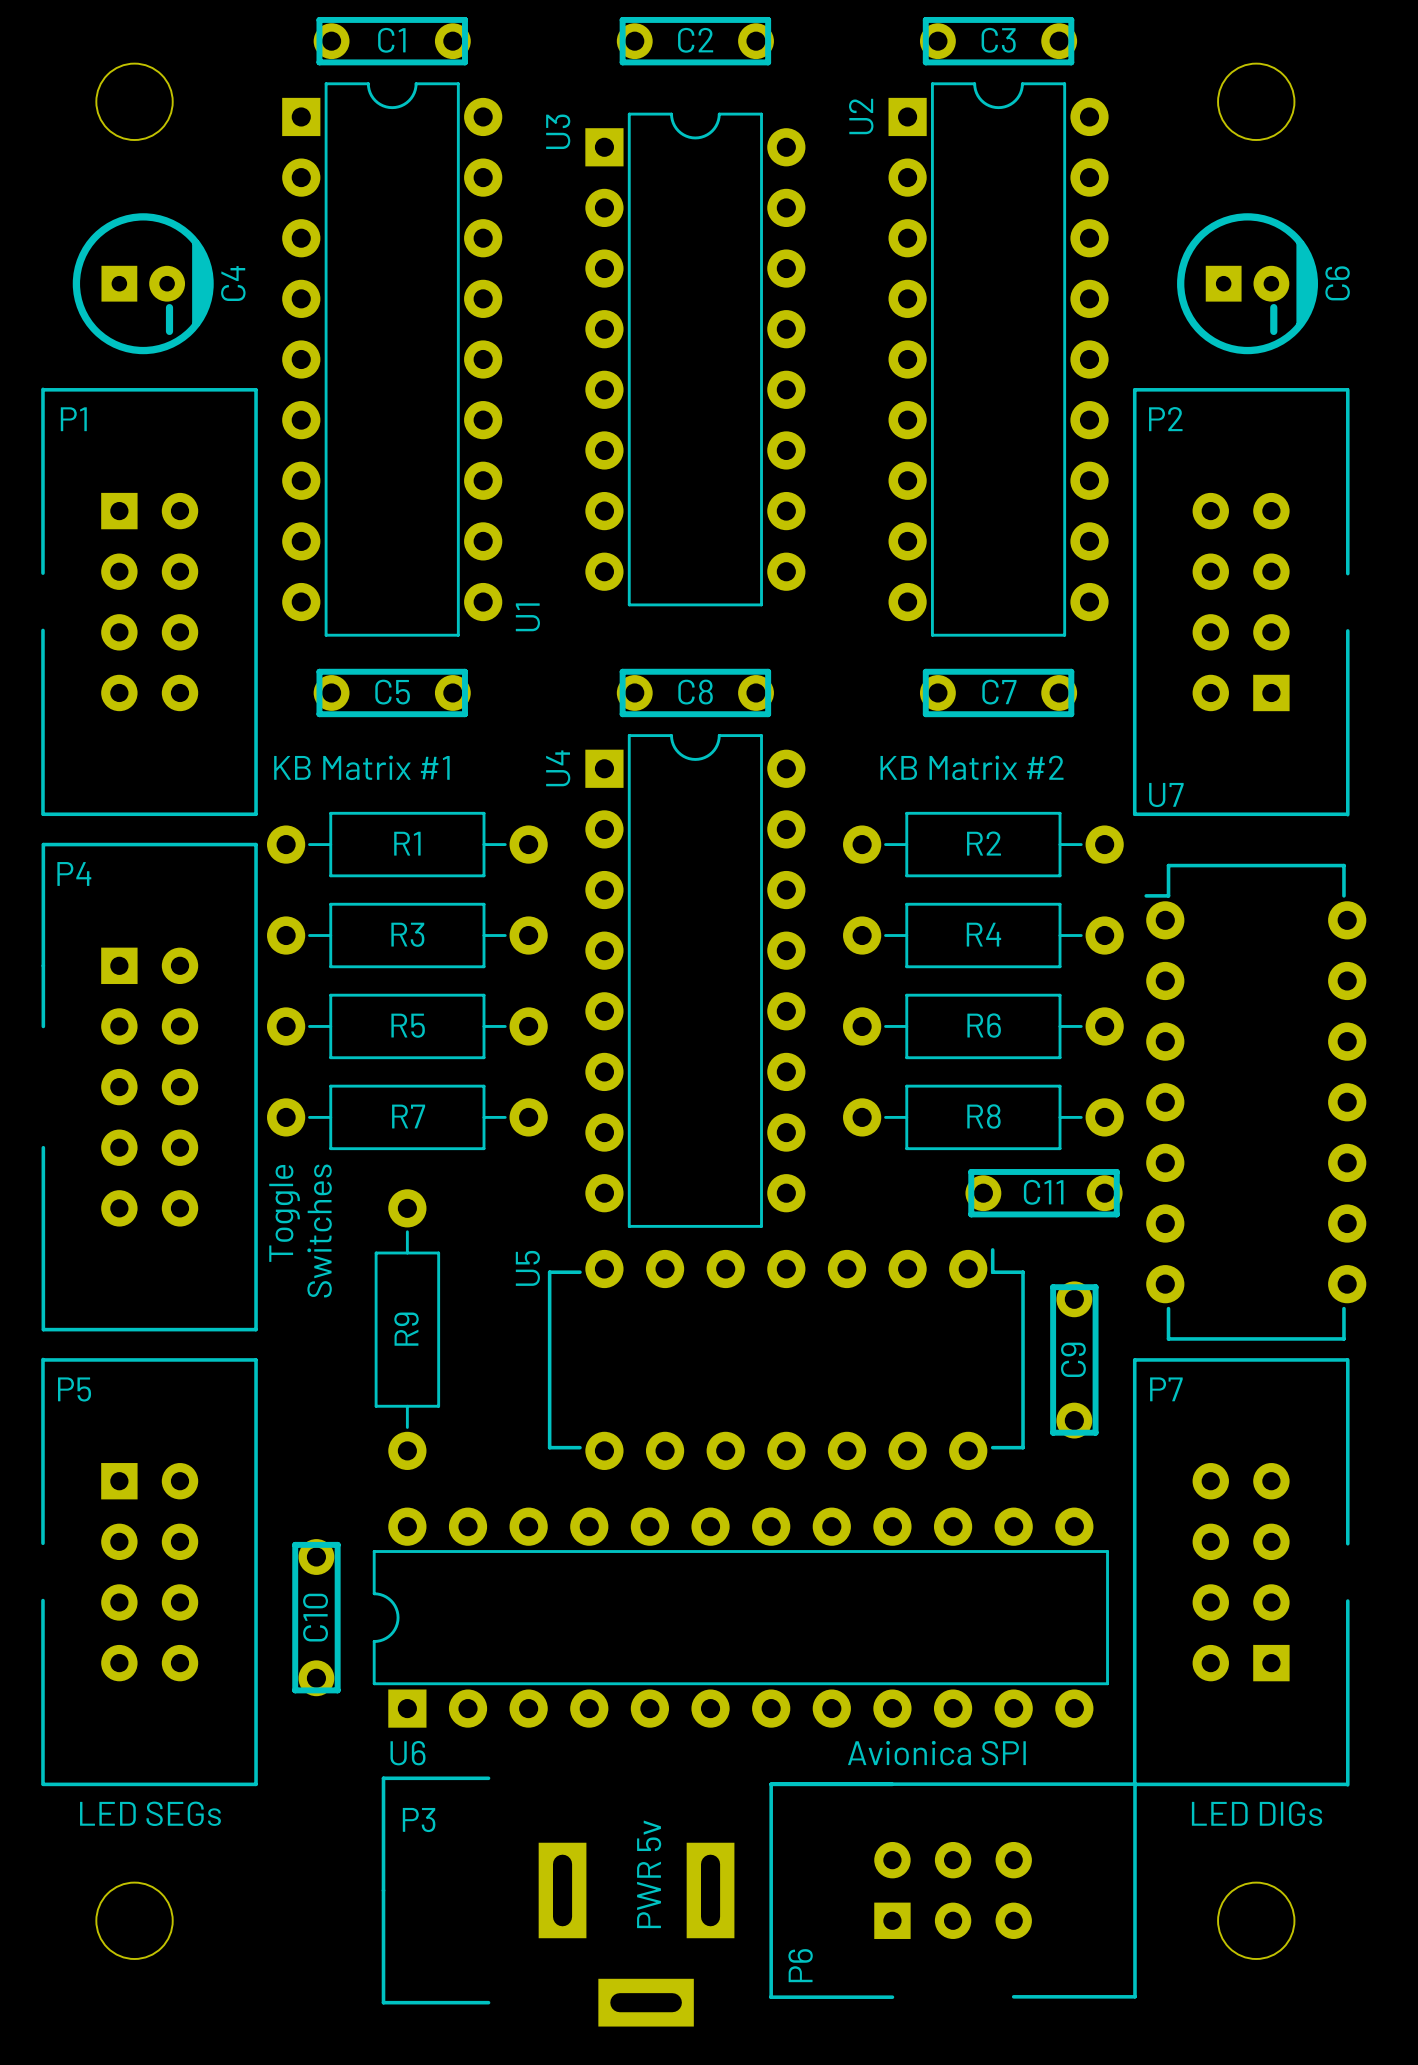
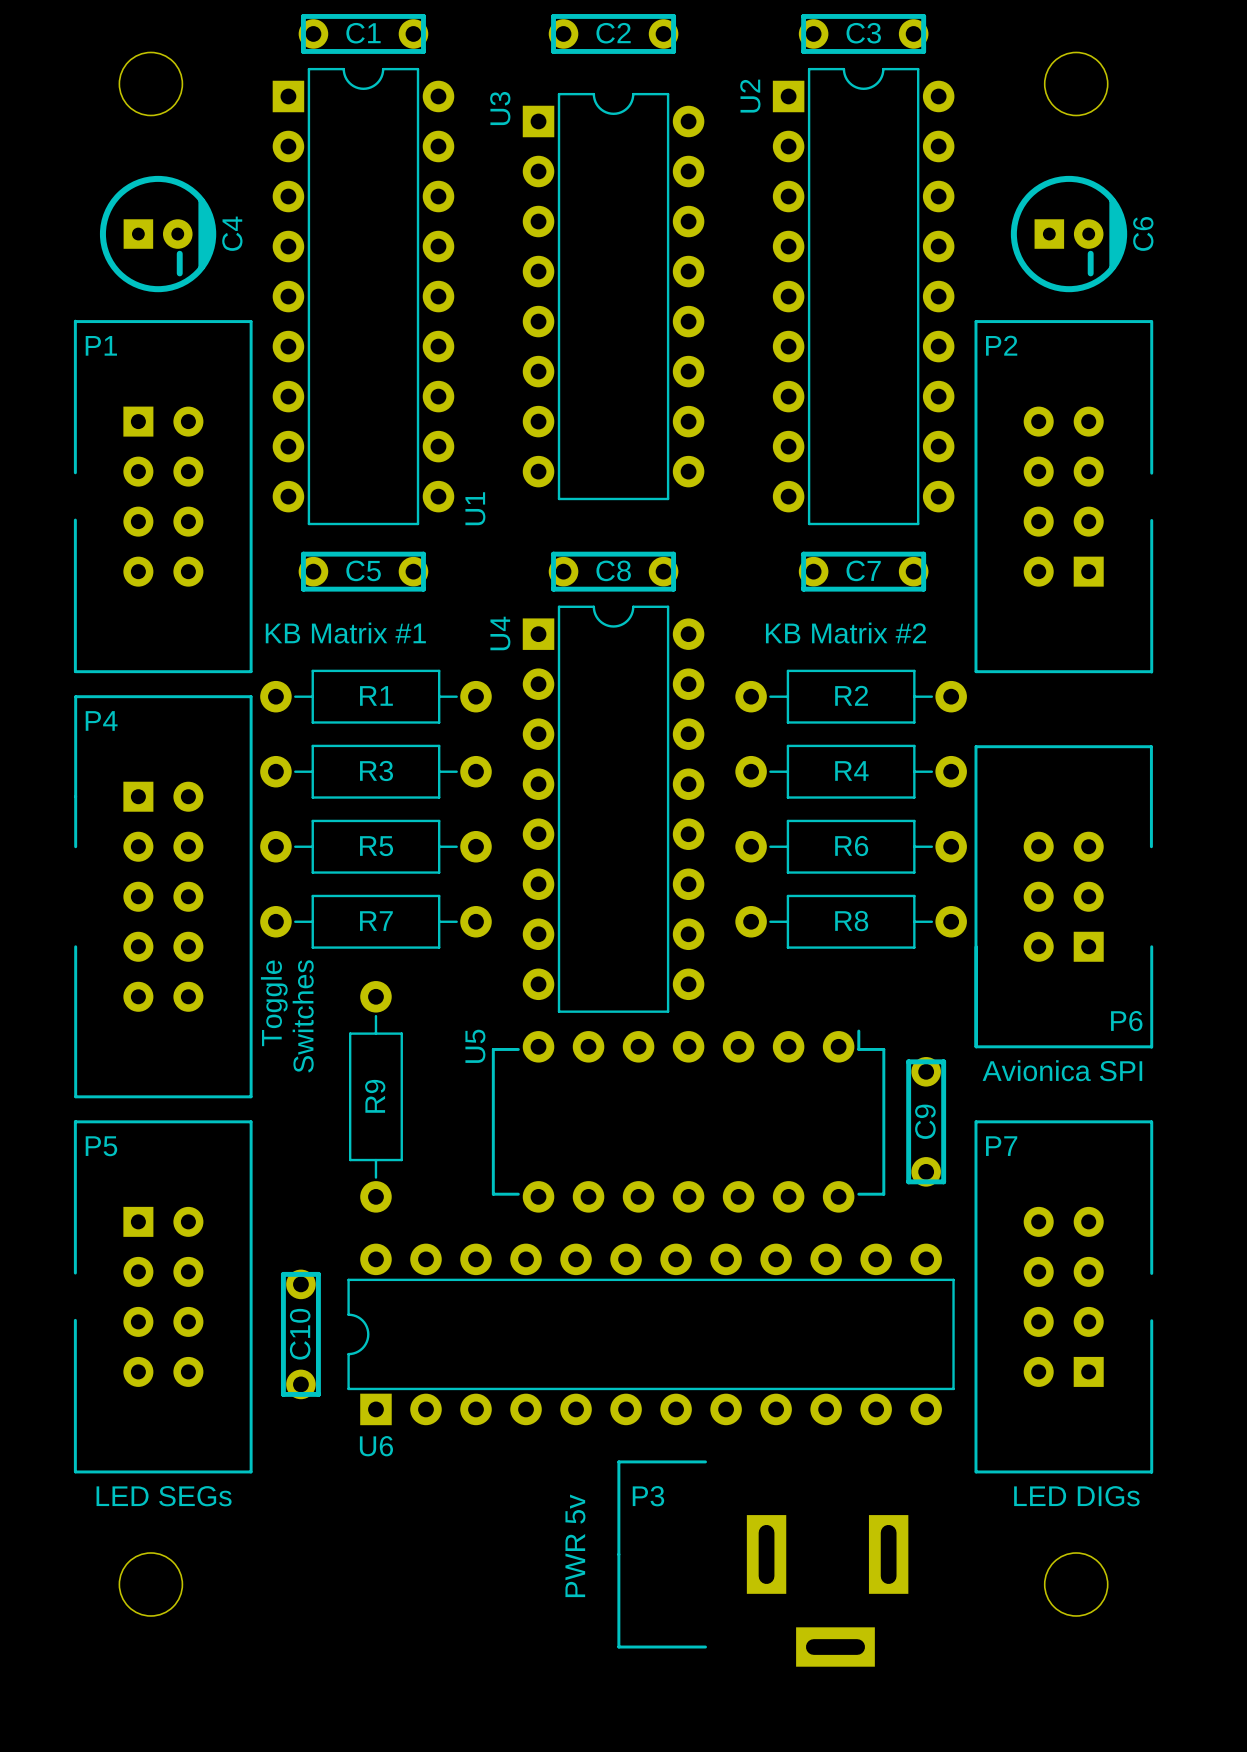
U7: (1255, 1102) -> none
C11: (1044, 1193) -> none
text position: Avionica SPI (936, 1753) -> Avionica SPI (1062, 1070)
P6 rotation: 0° (952, 1890) -> 90° counterclockwise (1063, 896)
P6 position: (952, 1890) -> (1063, 896)
P3 position: (558, 1901) -> (762, 1563)

